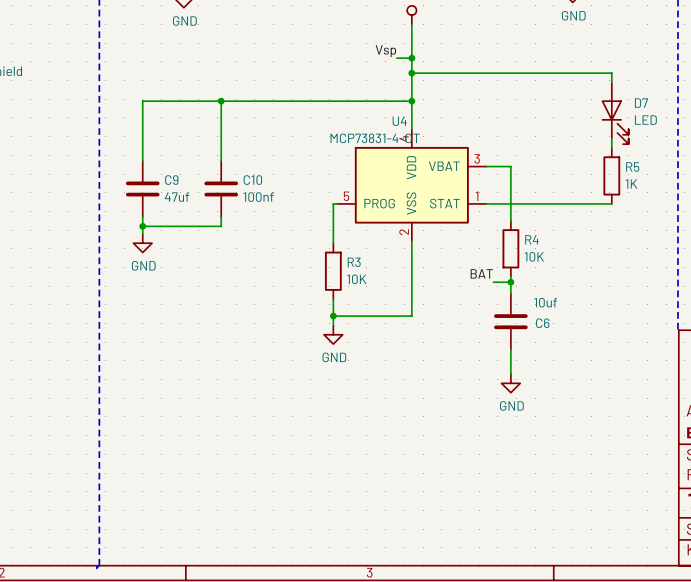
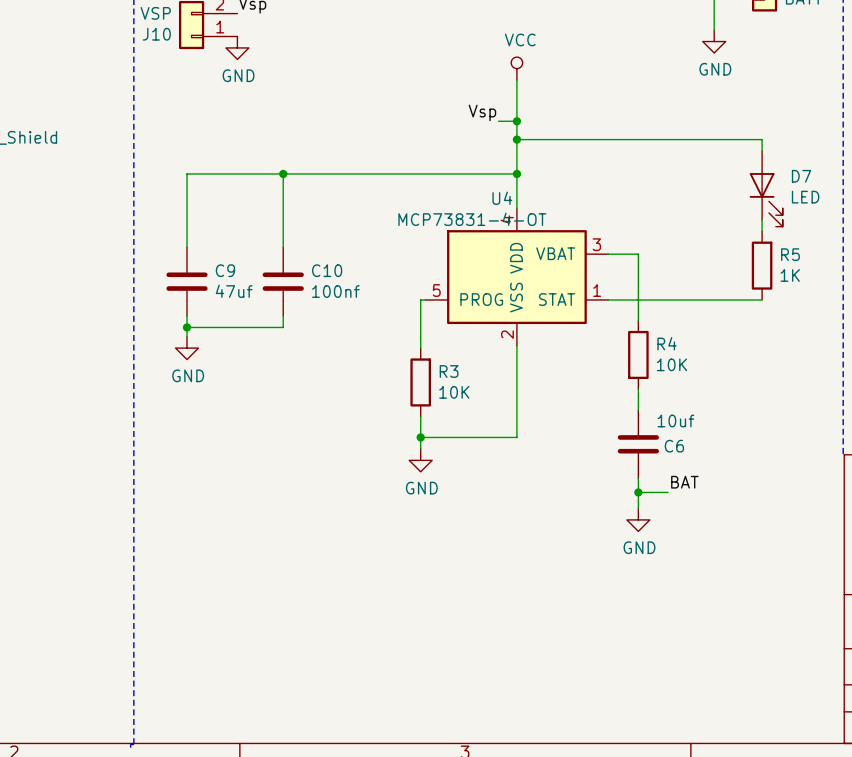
label position: BAT (481, 273) -> BAT (684, 482)
wire: (493, 282) (510, 282) -> none
junction: (510, 282) -> none
wire: none -> (638, 492) (668, 492)
junction: none -> (638, 492)

